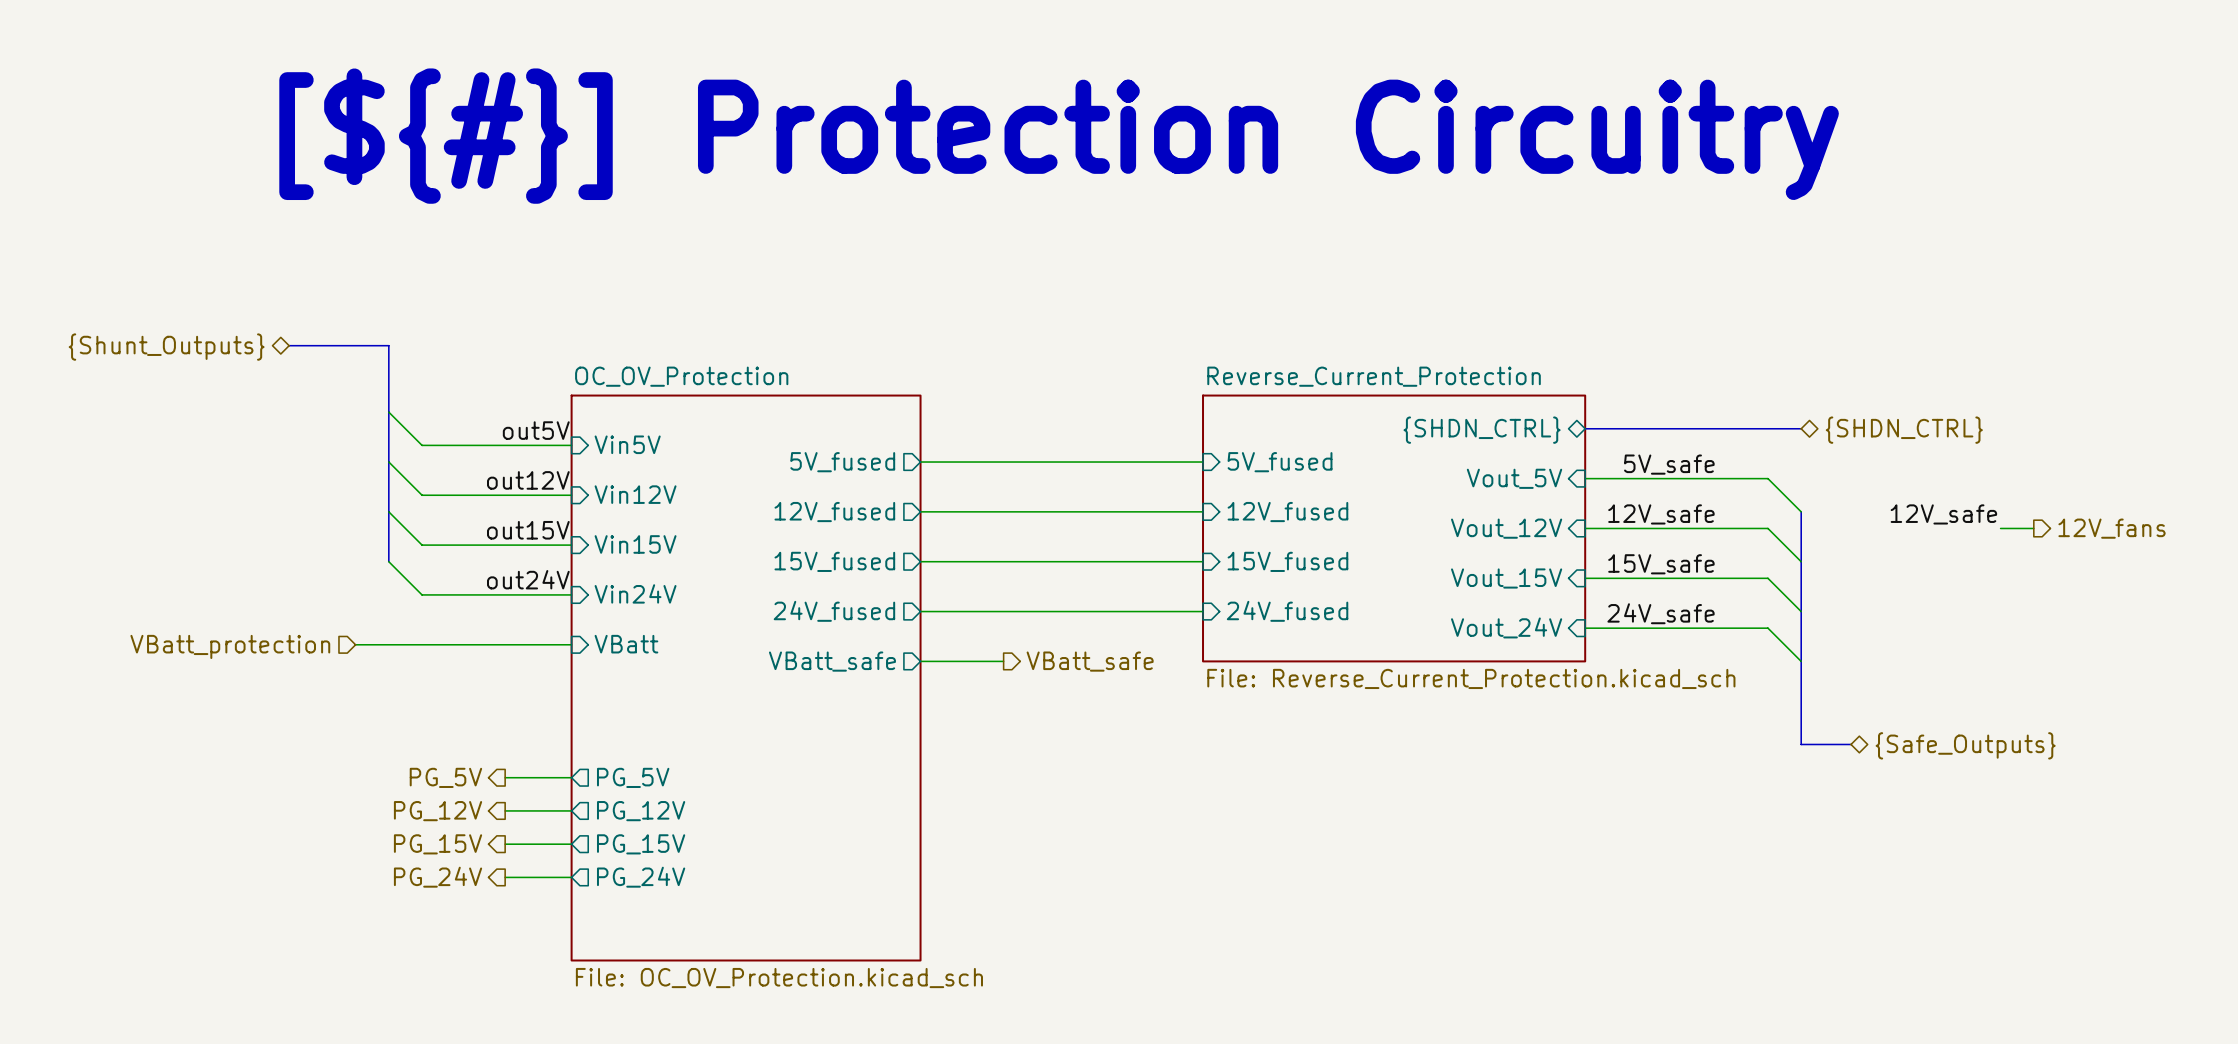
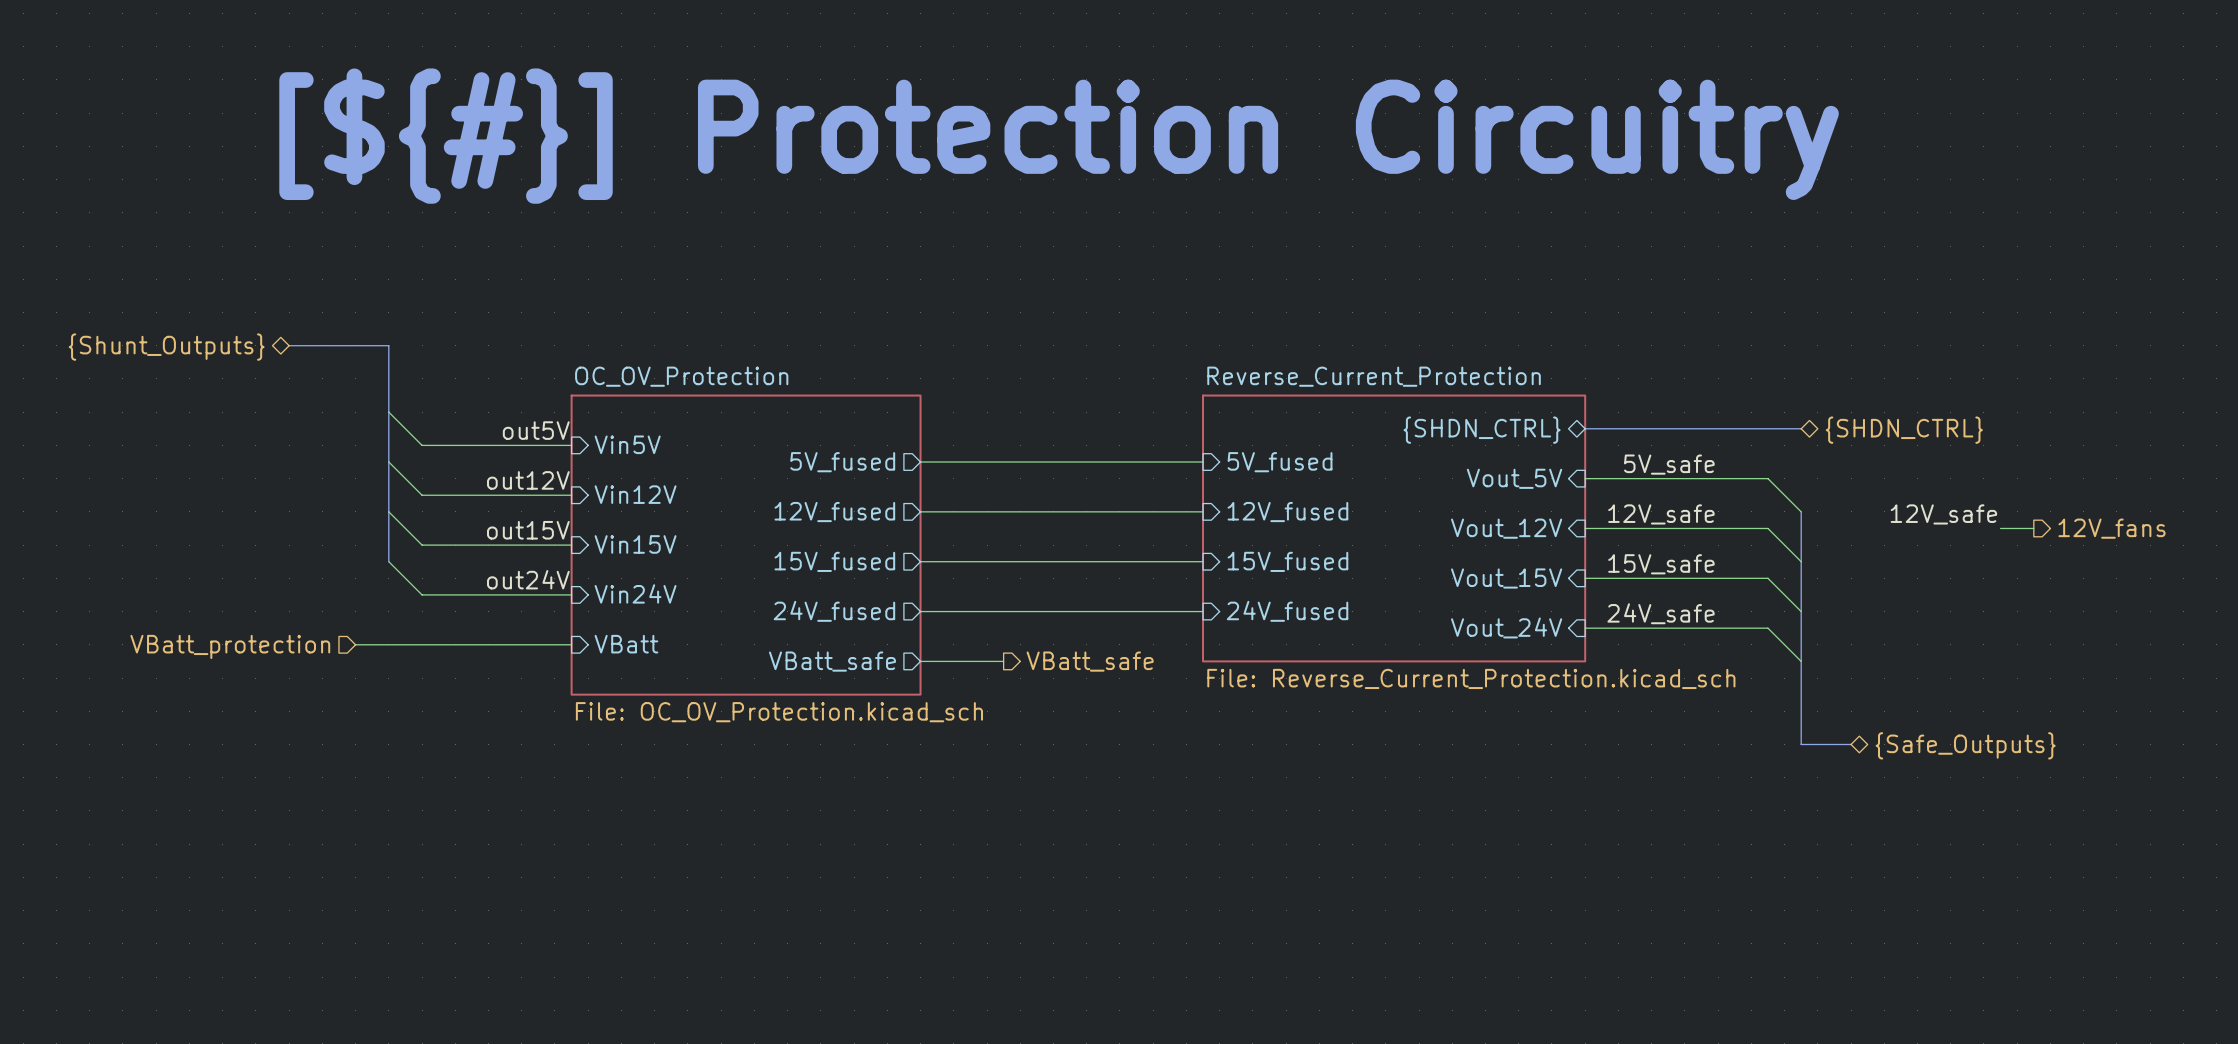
sheet OC_OV_Protection: none -> File: OC_OV_Protection.kicad_sch (746, 545)
sheet OC_OV_Protection: File: OC_OV_Protection.kicad_sch (746, 678) -> none
hierarchical label: PG_5V (445, 777) -> none
wire: (505, 777) (571, 777) -> none
sheet pin: PG_5V (633, 777) -> none
wire: (505, 810) (571, 810) -> none
hierarchical label: PG_12V (438, 811) -> none
sheet pin: PG_12V (641, 811) -> none
hierarchical label: PG_15V (438, 844) -> none
wire: (505, 844) (571, 844) -> none
sheet pin: PG_15V (641, 844) -> none
hierarchical label: PG_24V (438, 877) -> none
wire: (505, 877) (571, 877) -> none
sheet pin: PG_24V (641, 877) -> none

